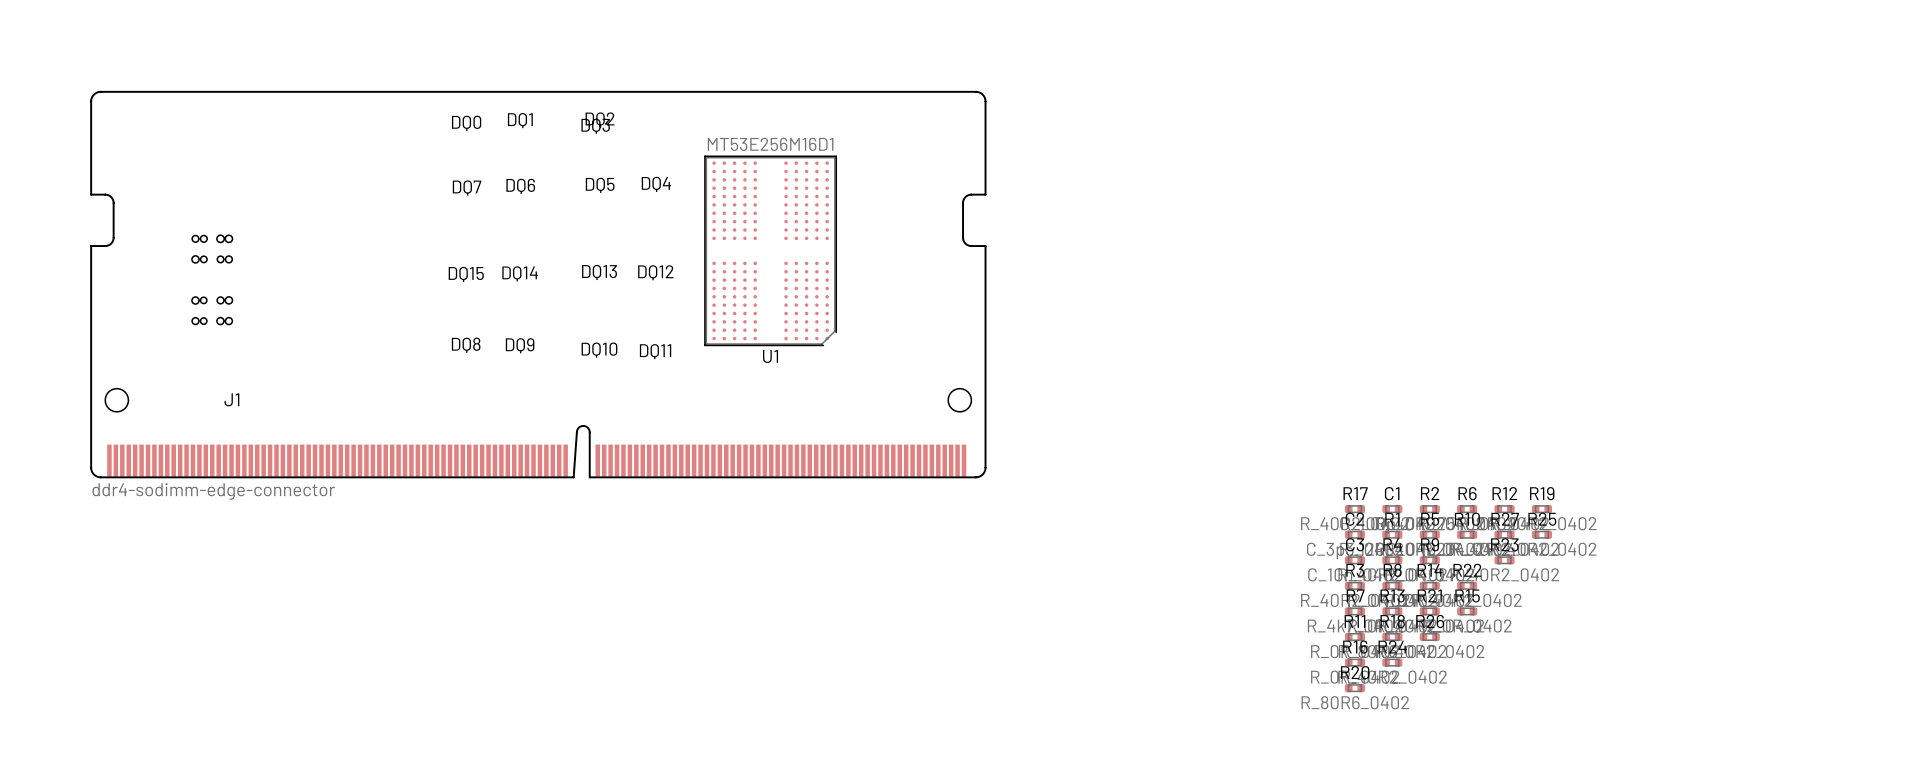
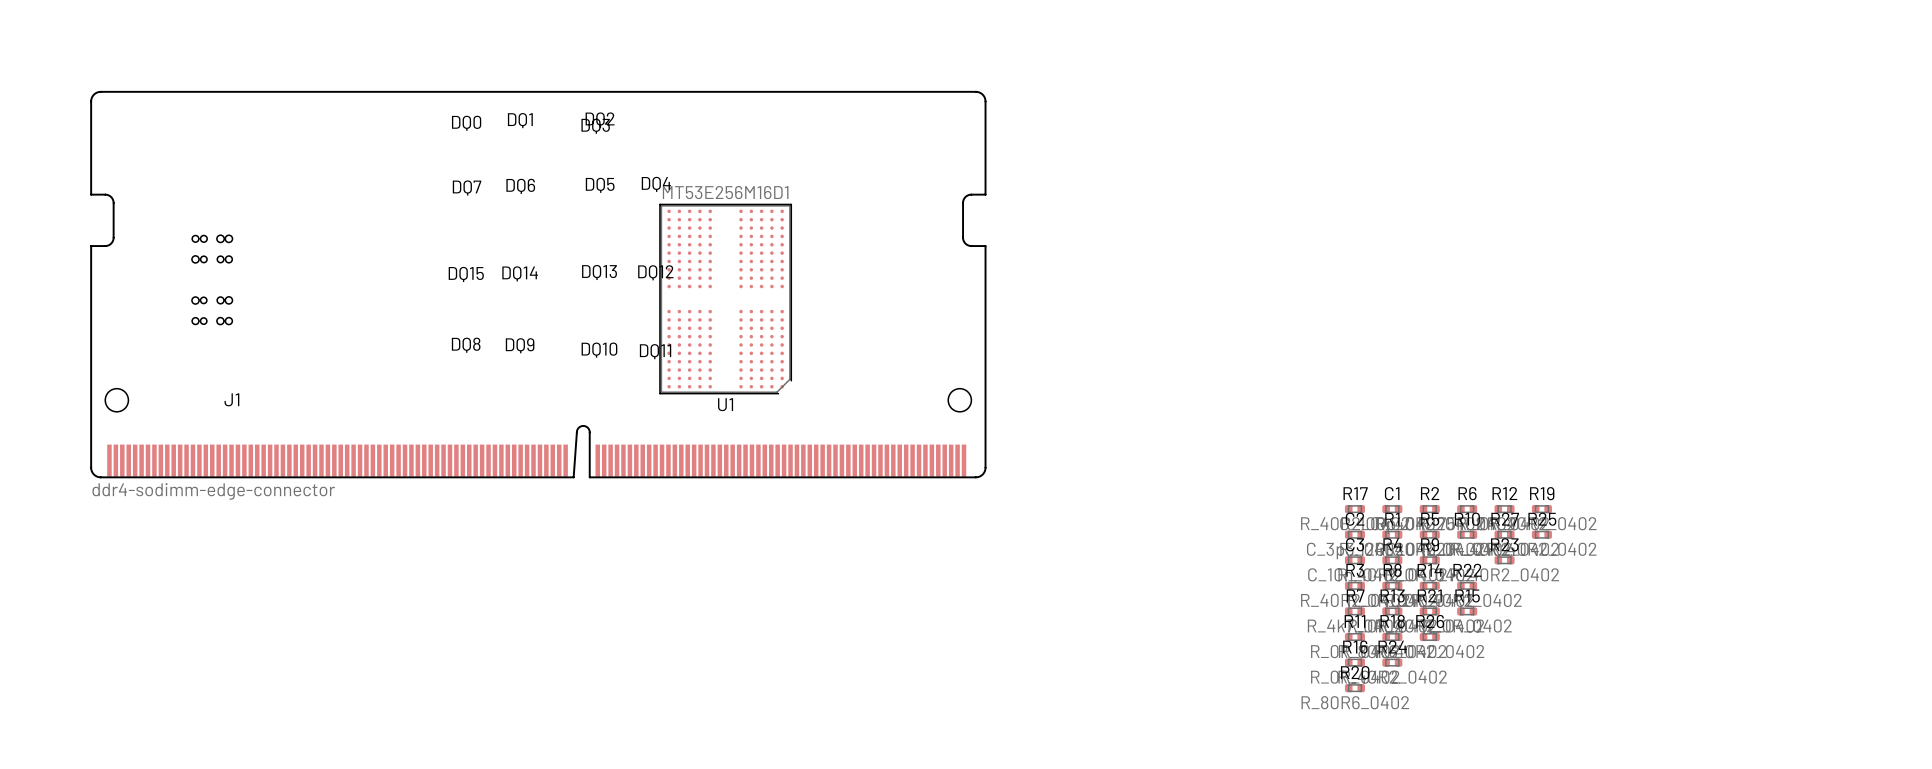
U1 position: (770, 250) -> (725, 299)

